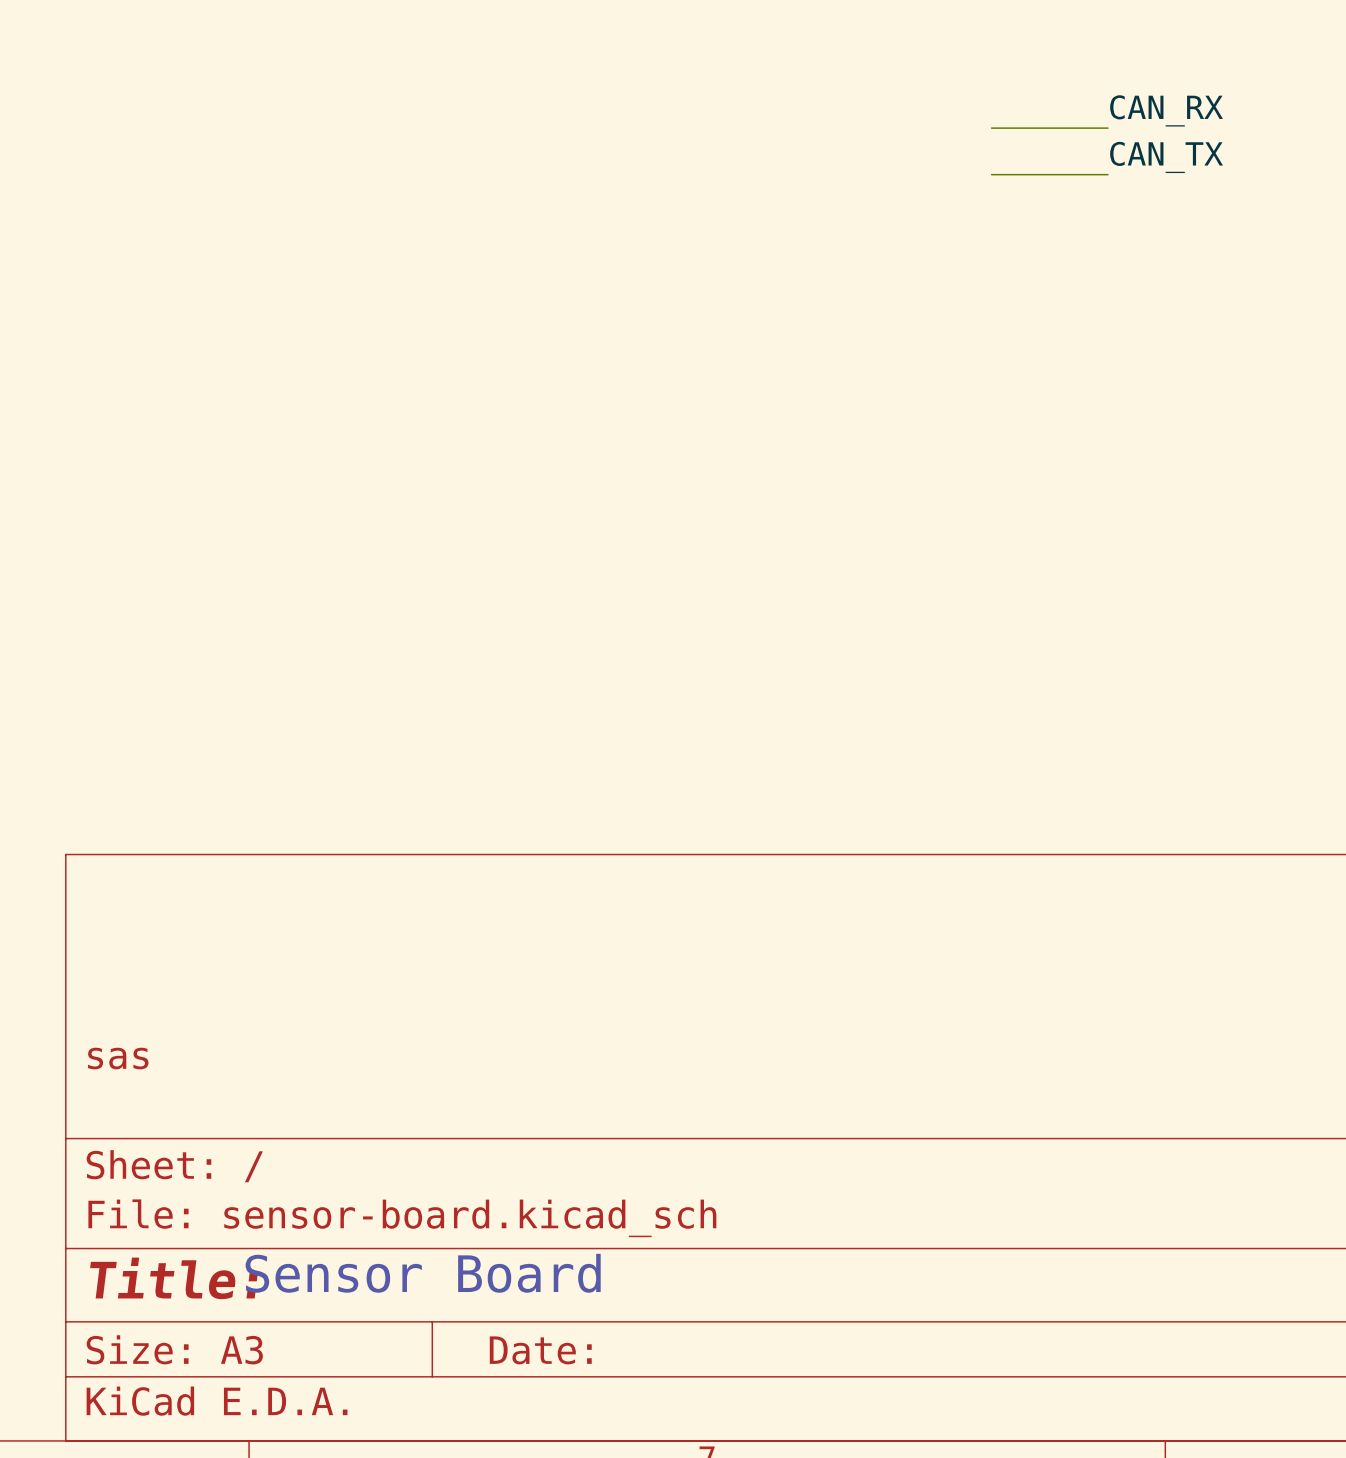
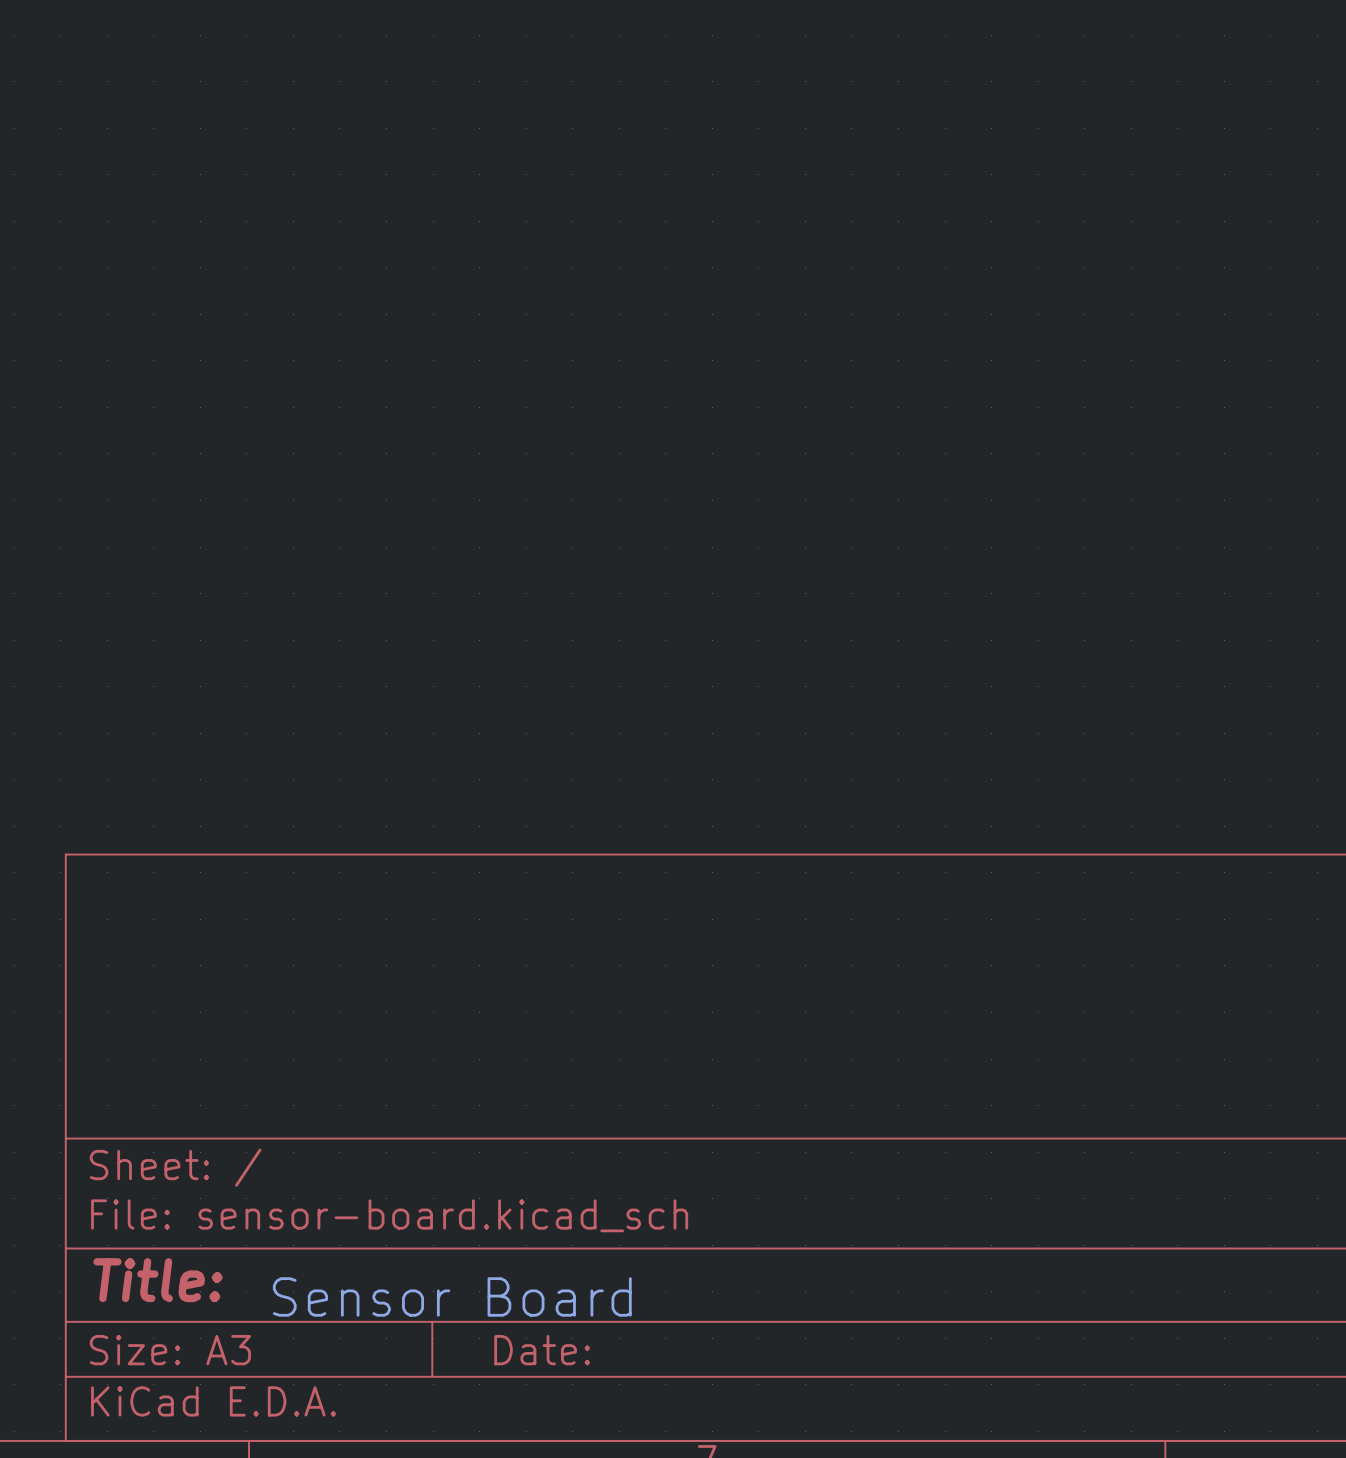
label: CAN_RX (1166, 110) -> none
wire: (991, 128) (1107, 128) -> none
label: CAN_TX (1166, 157) -> none
wire: (991, 174) (1107, 174) -> none
title block: sas (118, 1058) -> none
text position: Sensor Board (423, 1273) -> Sensor Board (452, 1296)

